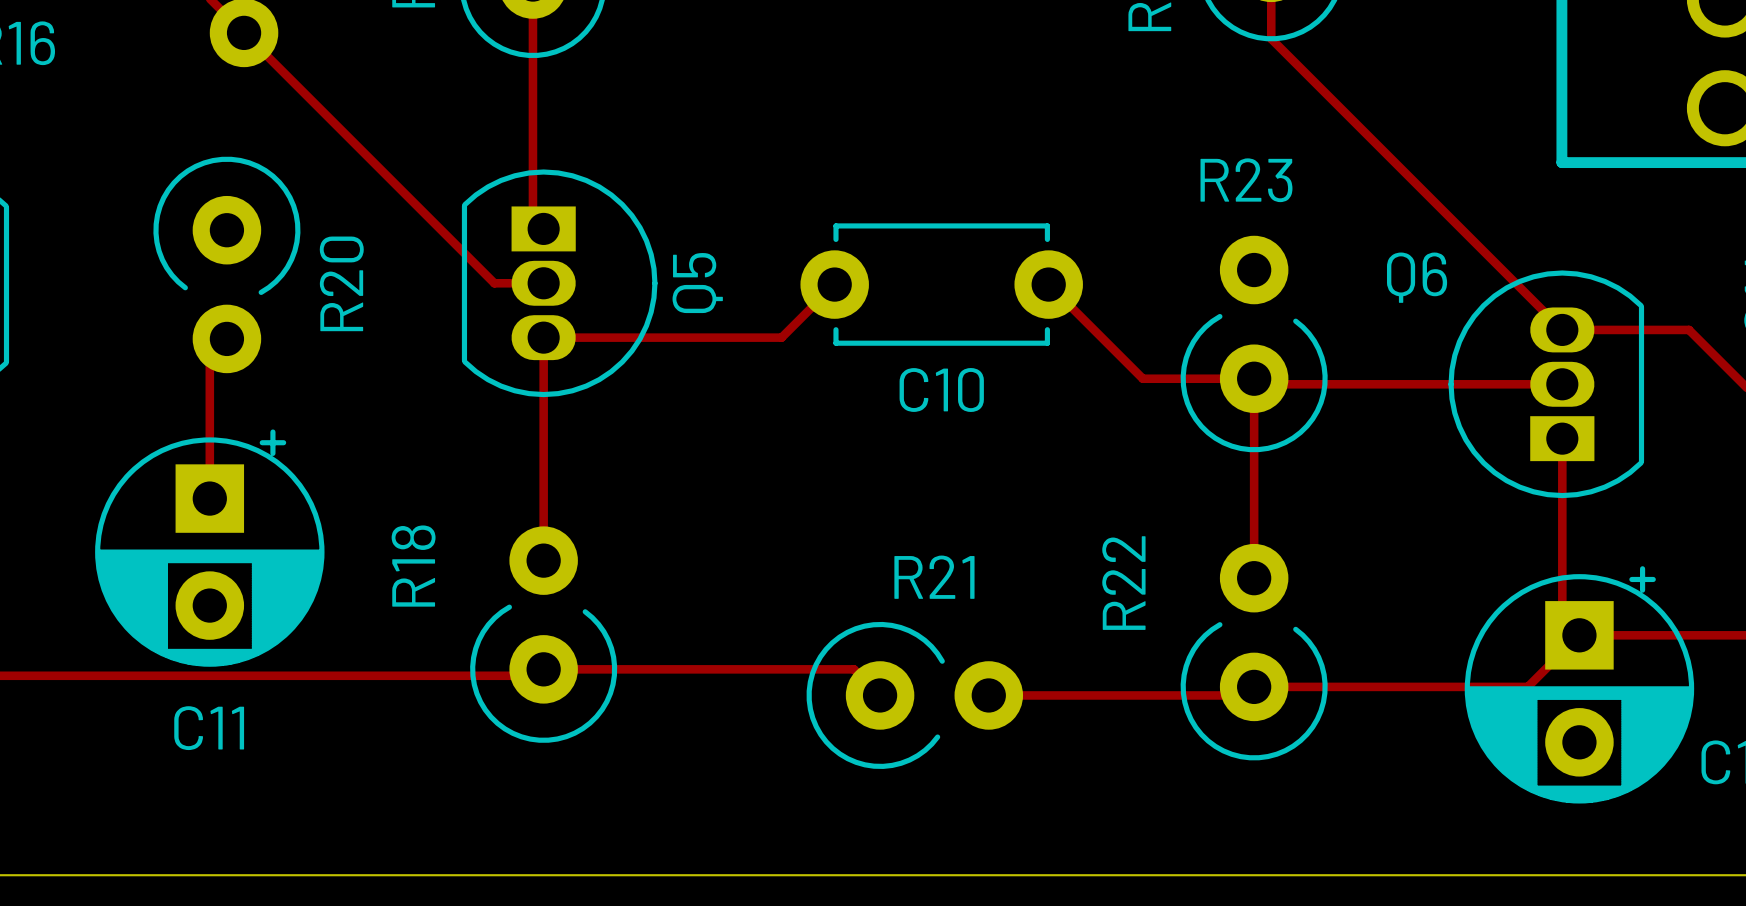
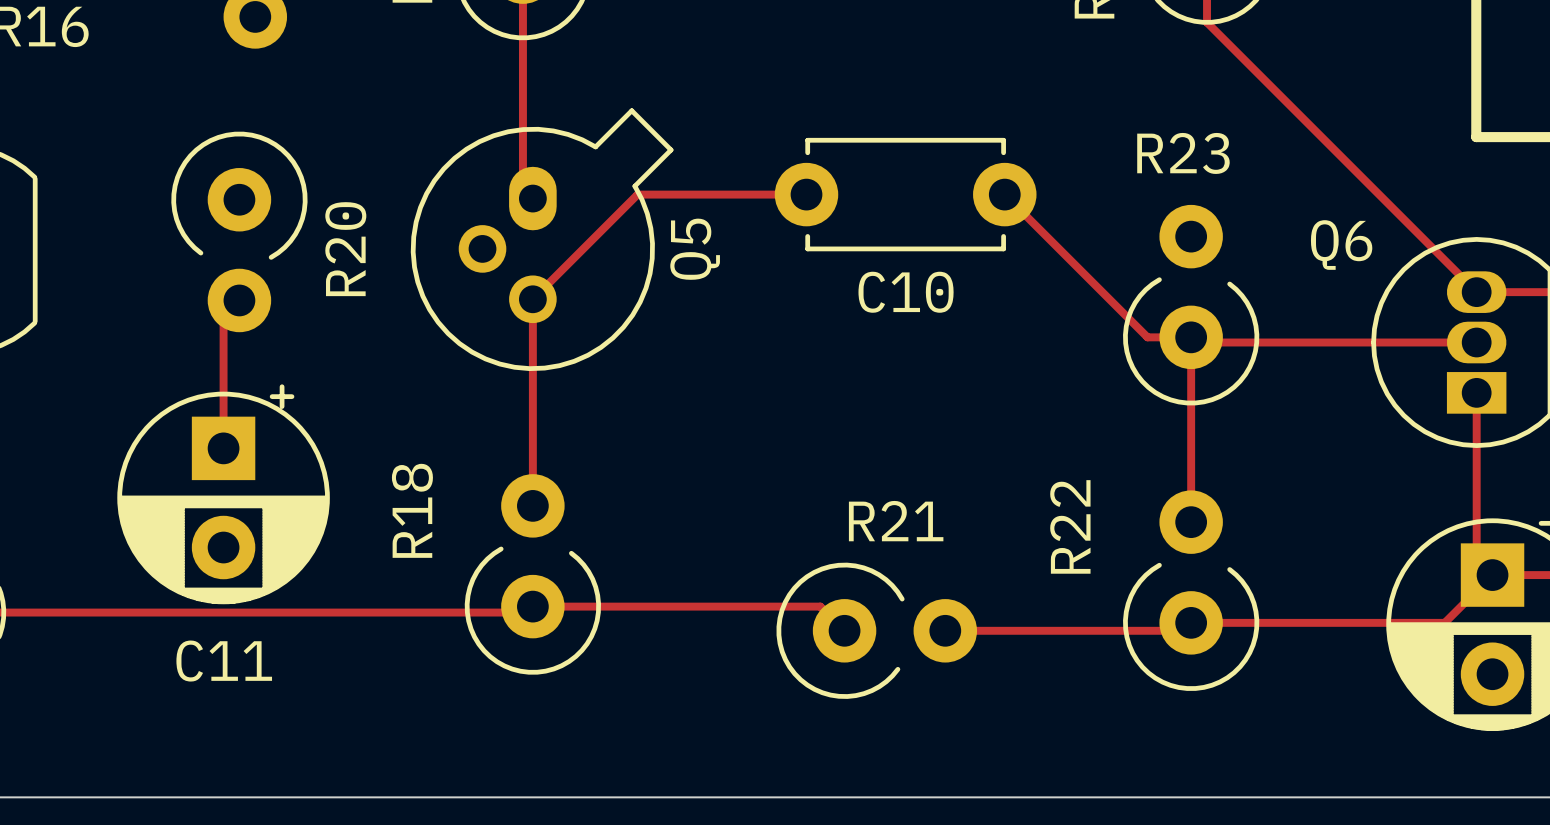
track: (244, 32) (494, 283) (543, 283) -> none
Q5 footprint: [461, 169, 658, 398] -> [410, 108, 674, 372]
track: (834, 284) (781, 337) (543, 337) -> (806, 194) (637, 194) (532, 299)
C10 position: (941, 284) -> (905, 194)
track: (1048, 284) (1142, 378) (1207, 378) -> (1004, 194) (1147, 337)

